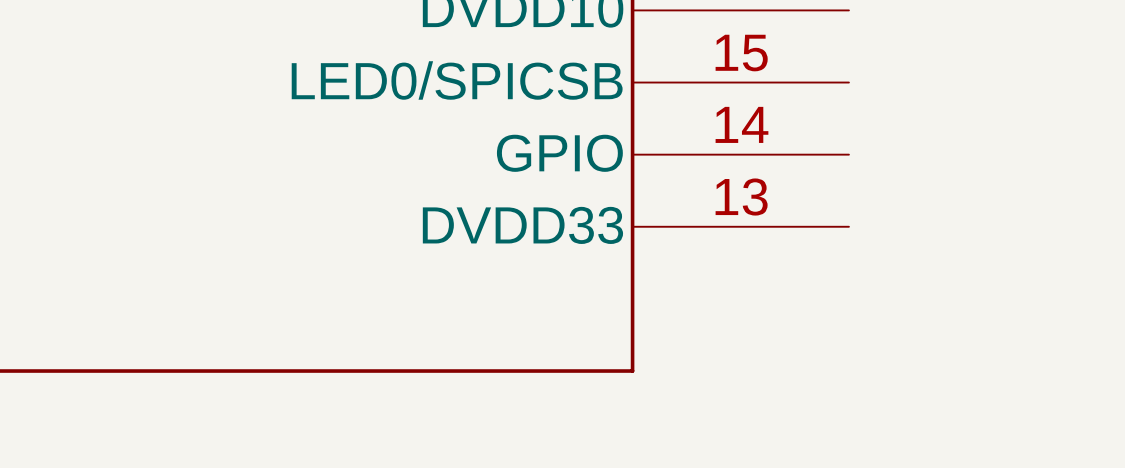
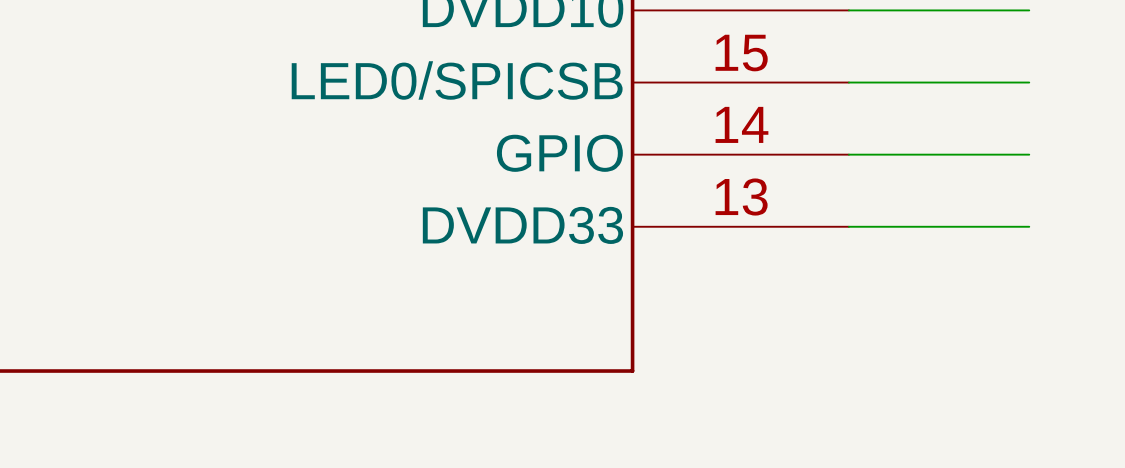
wire: none -> (848, 10) (1029, 10)
wire: none -> (848, 82) (1029, 82)
wire: none -> (848, 154) (1029, 154)
wire: none -> (848, 226) (1029, 226)

